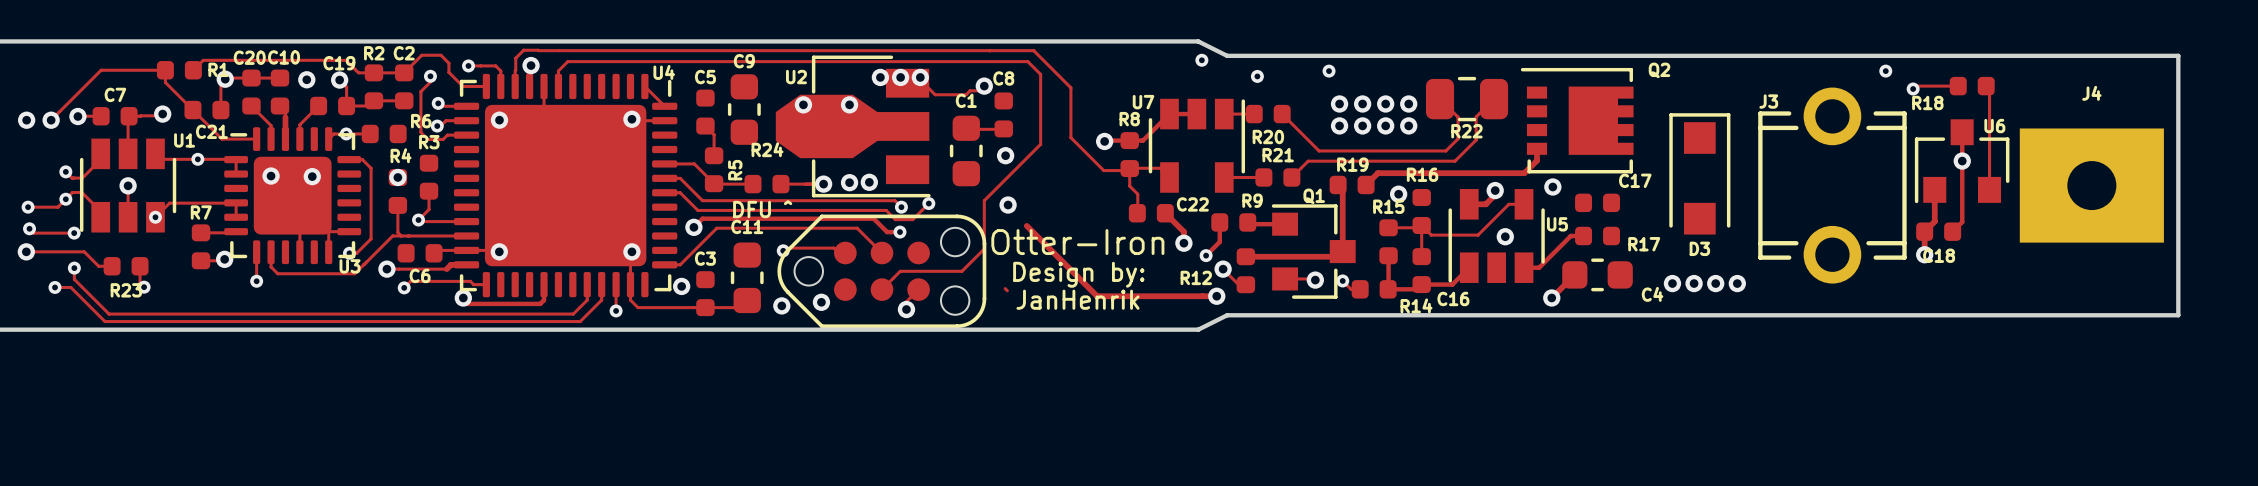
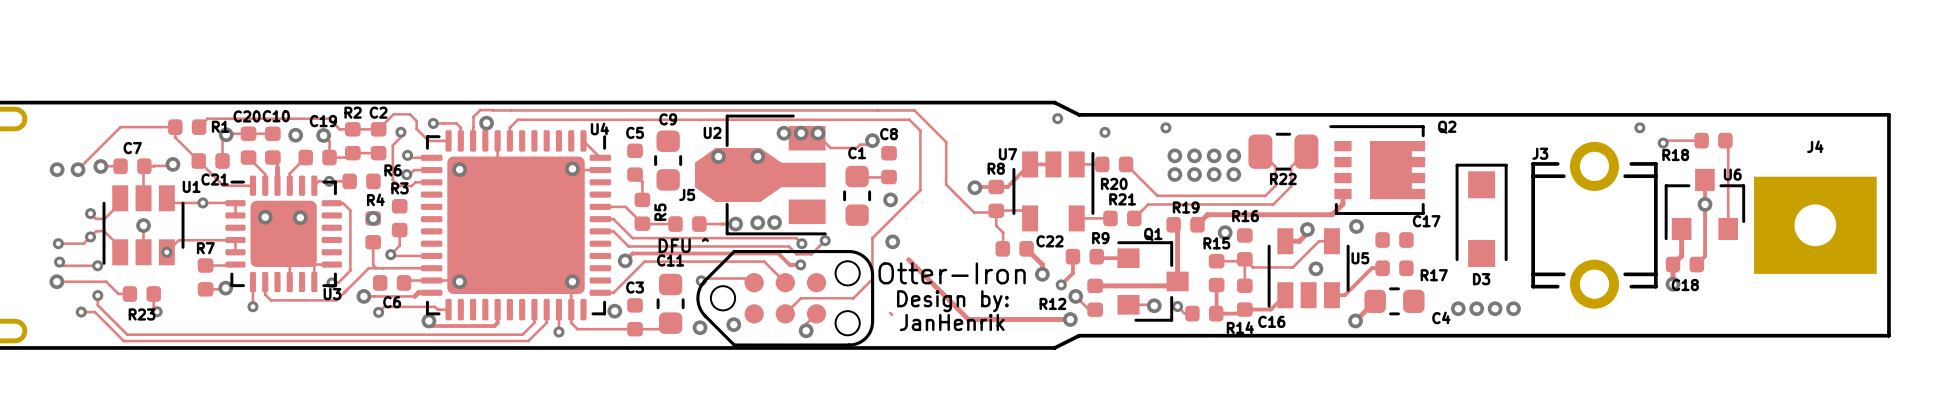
R24 name: R24 (767, 149) -> J5 (687, 194)

